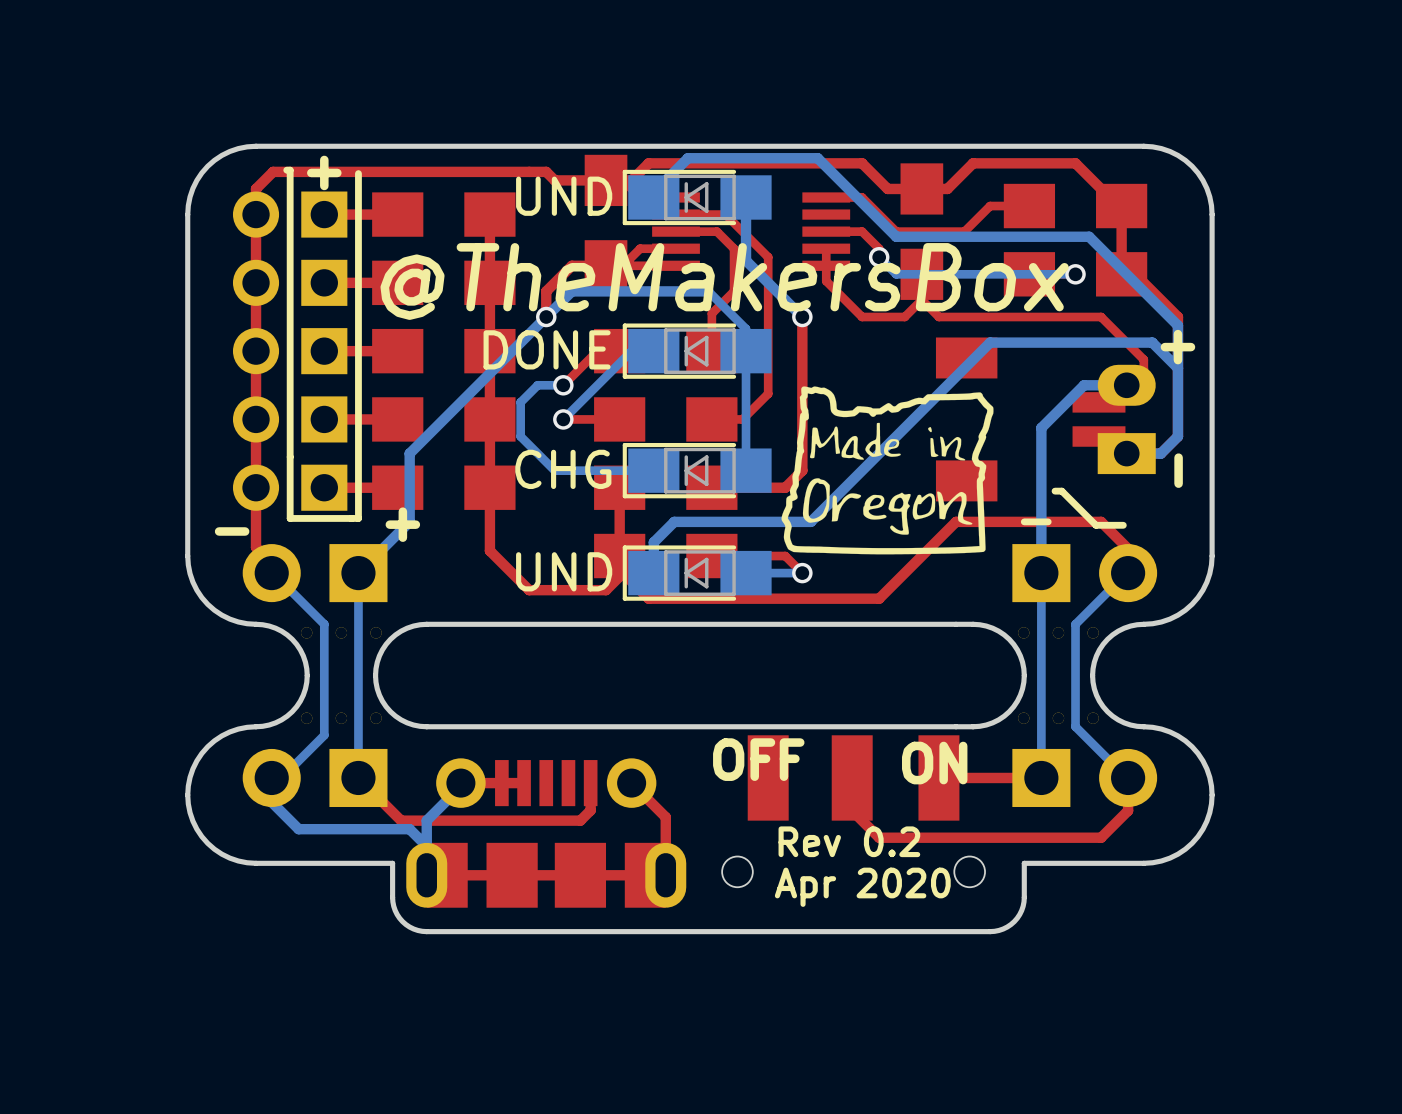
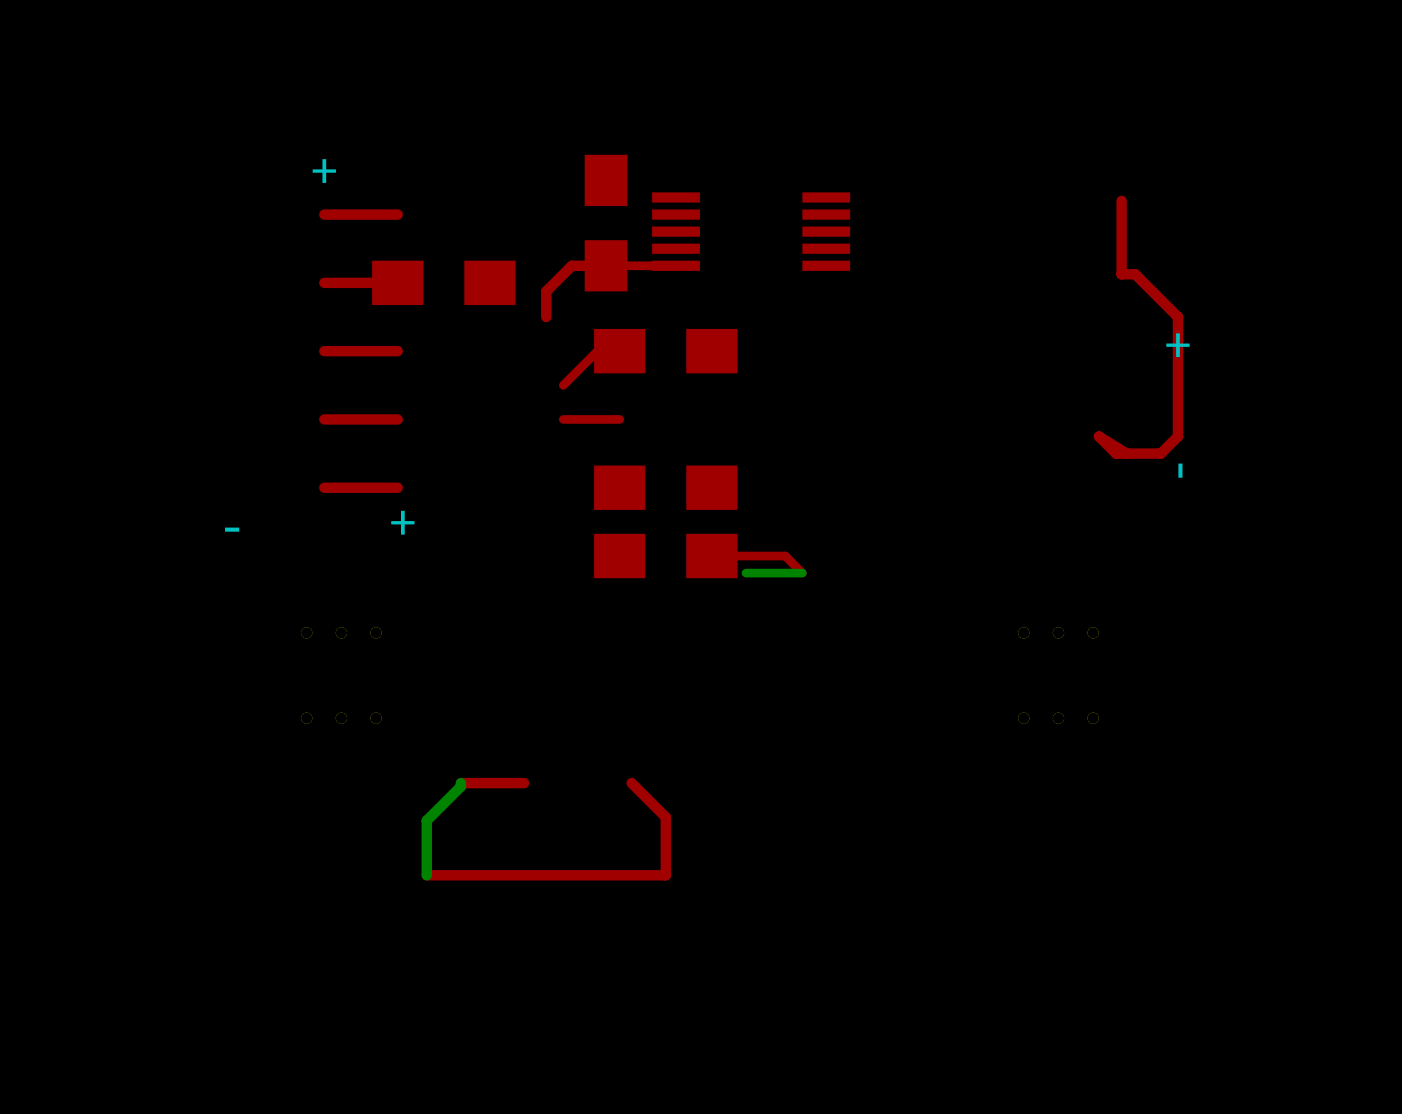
board edge: (1143, 146) (256, 146) (229, 151) (214, 160) (201, 172) (192, 188) (187, 214) (188, 564) (196, 590) (214, 610) (238, 621) (275, 628) (292, 639) (303, 655) (307, 675) (303, 695) (296, 706) (287, 716) (269, 725) (238, 729) (221, 735) (207, 746) (196, 760) (190, 777) (187, 795) (192, 821) (201, 836) (221, 854) (247, 862) (392, 863) (392, 901) (397, 914) (409, 927) (426, 931) (994, 931) (1010, 924) (1021, 910) (1024, 897) (1024, 863) (1152, 862) (1169, 858) (1185, 849) (1202, 829) (1209, 812) (1211, 786) (1202, 760) (1192, 746) (1177, 735) (1161, 729) (1130, 725) (1112, 716) (1103, 706) (1096, 695) (1092, 675) (1096, 655) (1107, 639) (1124, 628) (1161, 621) (1185, 610) (1202, 590) (1211, 564) (1211, 205) (1202, 180) (1192, 166) (1169, 151) (1143, 146) -> none
line: (286, 170) (290, 170) (290, 518) (358, 518) (358, 173) -> none
bottom track: (653, 197) (653, 192) (687, 158) (817, 158) (896, 236) (1089, 236) (1177, 325) (1177, 436) (1160, 453) (1126, 453) -> none
part: UND (697, 197) -> none
bottom track: (746, 197) (746, 260) (802, 317) -> none
top track: (1020, 197) (1029, 206) (990, 206) (964, 231) (896, 231) (862, 197) (826, 197) -> none
part: (1075, 206) -> none
top track: (1121, 206) (1118, 206) (1075, 163) (973, 163) (947, 188) (887, 188) (862, 163) (648, 163) (631, 180) (554, 180) (546, 171) (273, 171) (256, 188) (256, 547) (271, 563) (271, 573) -> none
part: (290, 214) -> none
part: (443, 214) -> none
top track: (489, 214) (489, 550) (529, 590) (606, 590) (619, 576) (619, 487) -> none
top track: (676, 214) (725, 214) (768, 257) (768, 393) (742, 419) (711, 419) -> none
top track: (676, 231) (716, 231) (734, 248) (734, 291) (711, 313) (711, 351) -> none
top track: (826, 231) (862, 231) (879, 248) (879, 257) -> none
part: (921, 231) -> none
top track: (676, 248) (640, 248) (623, 265) -> none
top track: (826, 248) (826, 281) (862, 317) (904, 317) (921, 299) -> none
bottom track: (879, 257) (896, 274) (1075, 274) -> none
via: (879, 257) -> none
part: (1075, 274) -> none
via: (1075, 274) -> none
text: @TheMakersBox (724, 281) -> none
part: (290, 282) -> none
top track: (921, 299) (938, 317) (1101, 317) (1143, 359) (1143, 385) (1118, 385) -> none
via: (546, 317) -> none
top track: (802, 317) (802, 470) (785, 487) (711, 487) -> none
via: (802, 317) -> none
part: (290, 351) -> none
part: (443, 351) -> none
bottom track: (653, 351) (631, 351) (563, 419) -> none
part: DONE (697, 351) -> none
bottom track: (1177, 368) (1152, 342) (990, 342) (810, 521) (674, 521) (653, 542) (653, 573) -> none
bottom track: (563, 385) (537, 385) (520, 402) (520, 436) (554, 470) (653, 470) -> none
via: (563, 385) -> none
bottom track: (1126, 385) (1084, 385) (1041, 427) (1041, 777) -> none
drawing: [781, 386, 994, 555] -> none
part: (290, 419) -> none
part: (443, 419) -> none
via: (563, 419) -> none
part: (665, 419) -> none
part: (1030, 419) -> none
part: (1126, 419) -> none
part: CHG (697, 470) -> none
bottom track: (746, 470) (746, 328) (708, 291) (571, 291) (409, 453) (409, 521) (358, 573) (358, 777) -> none
part: (290, 487) -> none
part: (443, 487) -> none
line: (1055, 491) (1061, 491) (1096, 525) (1123, 525) -> none
line: (1048, 521) (1024, 521) -> none
top track: (619, 569) (648, 598) (879, 598) (956, 521) (1101, 521) (1128, 548) (1128, 573) -> none
bottom track: (271, 573) (324, 624) (324, 735) (281, 777) (271, 777) (271, 802) (298, 829) (409, 829) (426, 846) -> none
part: (315, 573) -> none
part: UND (697, 573) -> none
via: (802, 573) -> none
part: (1084, 573) -> none
bottom track: (1128, 573) (1075, 624) (1075, 726) (1128, 777) -> none
board edge: (973, 624) (420, 624) (401, 631) (386, 644) (377, 662) (375, 682) (379, 695) (390, 711) (407, 722) (420, 726) (979, 726) (998, 719) (1013, 706) (1022, 688) (1023, 668) (1017, 649) (1004, 634) (986, 626) (973, 624) -> none
text: OFF (758, 759) -> none
text: ON (934, 763) -> none
part: (315, 777) -> none
top track: (358, 777) (401, 820) (580, 820) (590, 810) (590, 783) -> none
top track: (1041, 777) (938, 777) -> none
part: (1084, 777) -> none
top track: (1128, 777) (1128, 810) (1101, 837) (879, 837) (852, 810) (852, 777) -> none
part: (853, 811) -> none
part: (546, 833) -> none
text: Rev 0.2 (849, 841) -> none
text: Apr 2020 (862, 887) -> none

